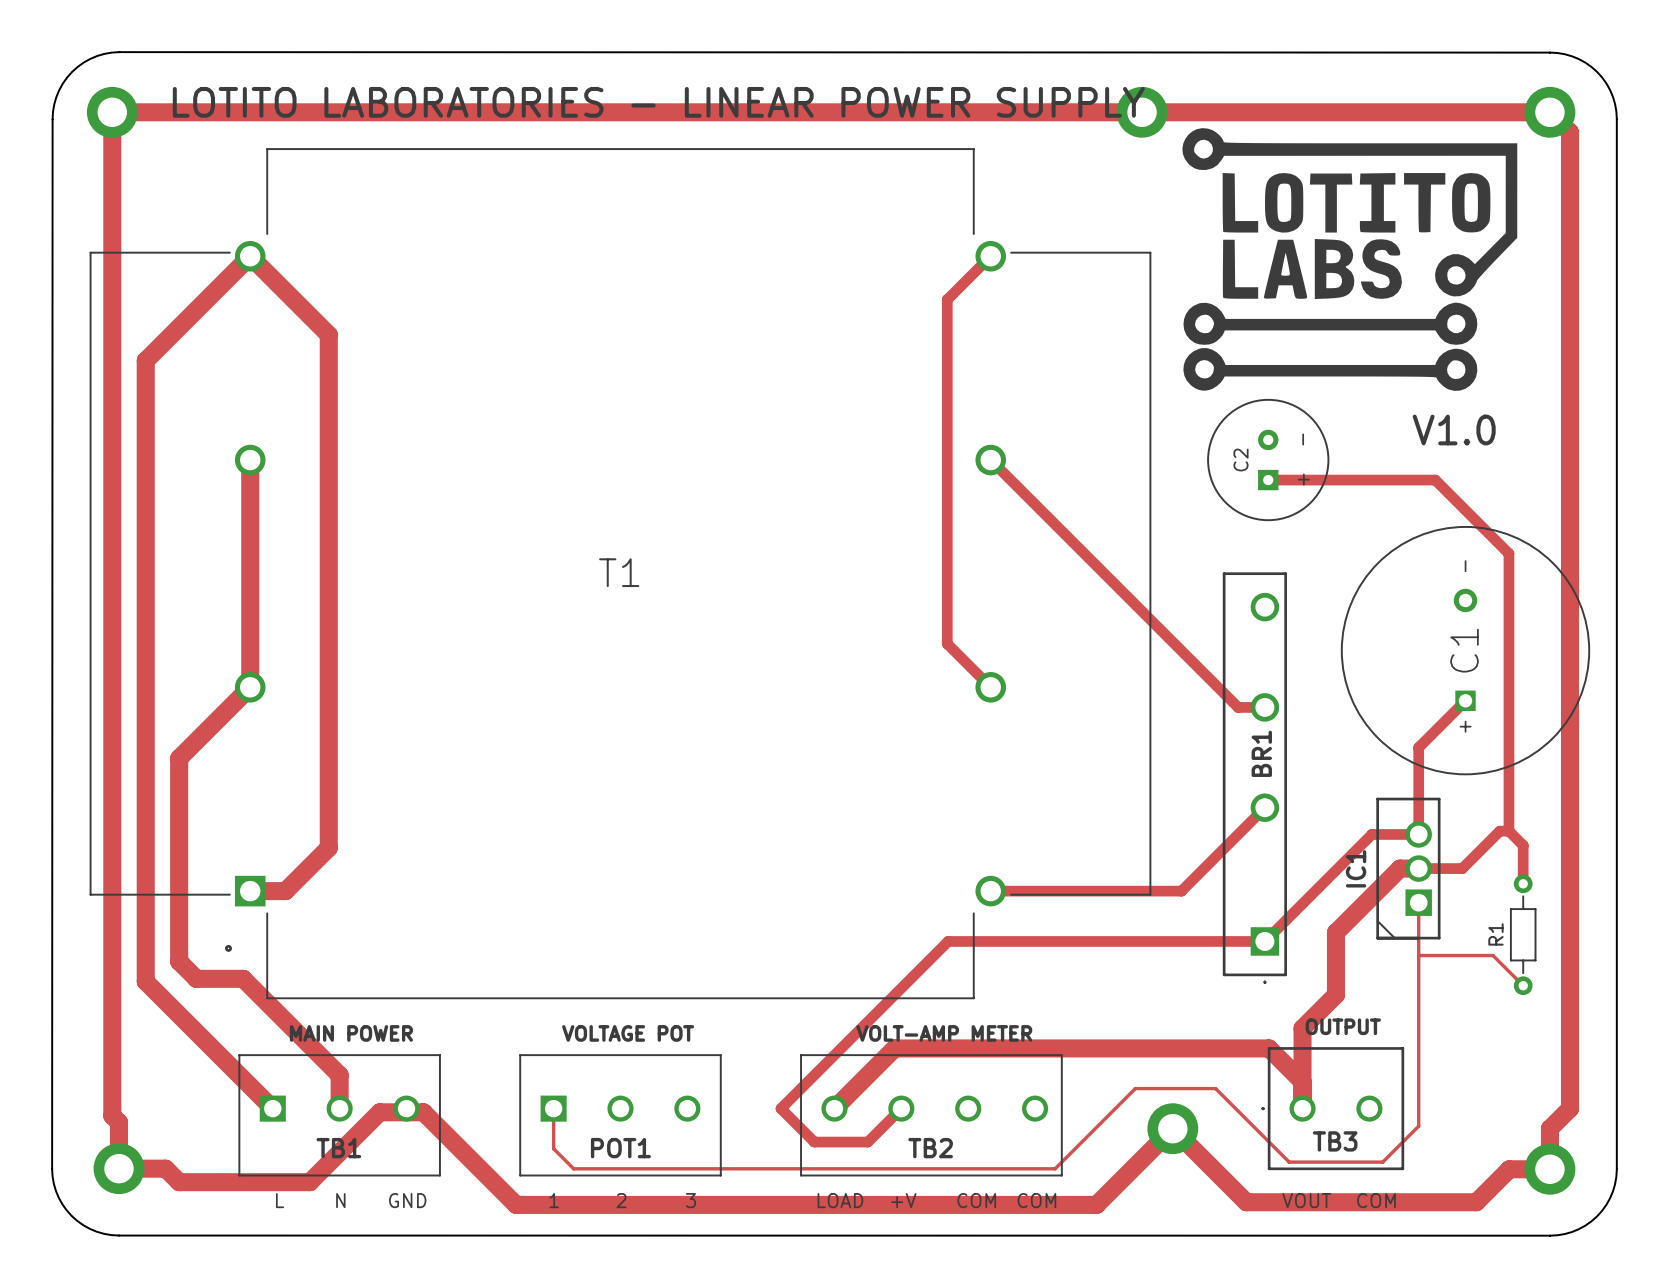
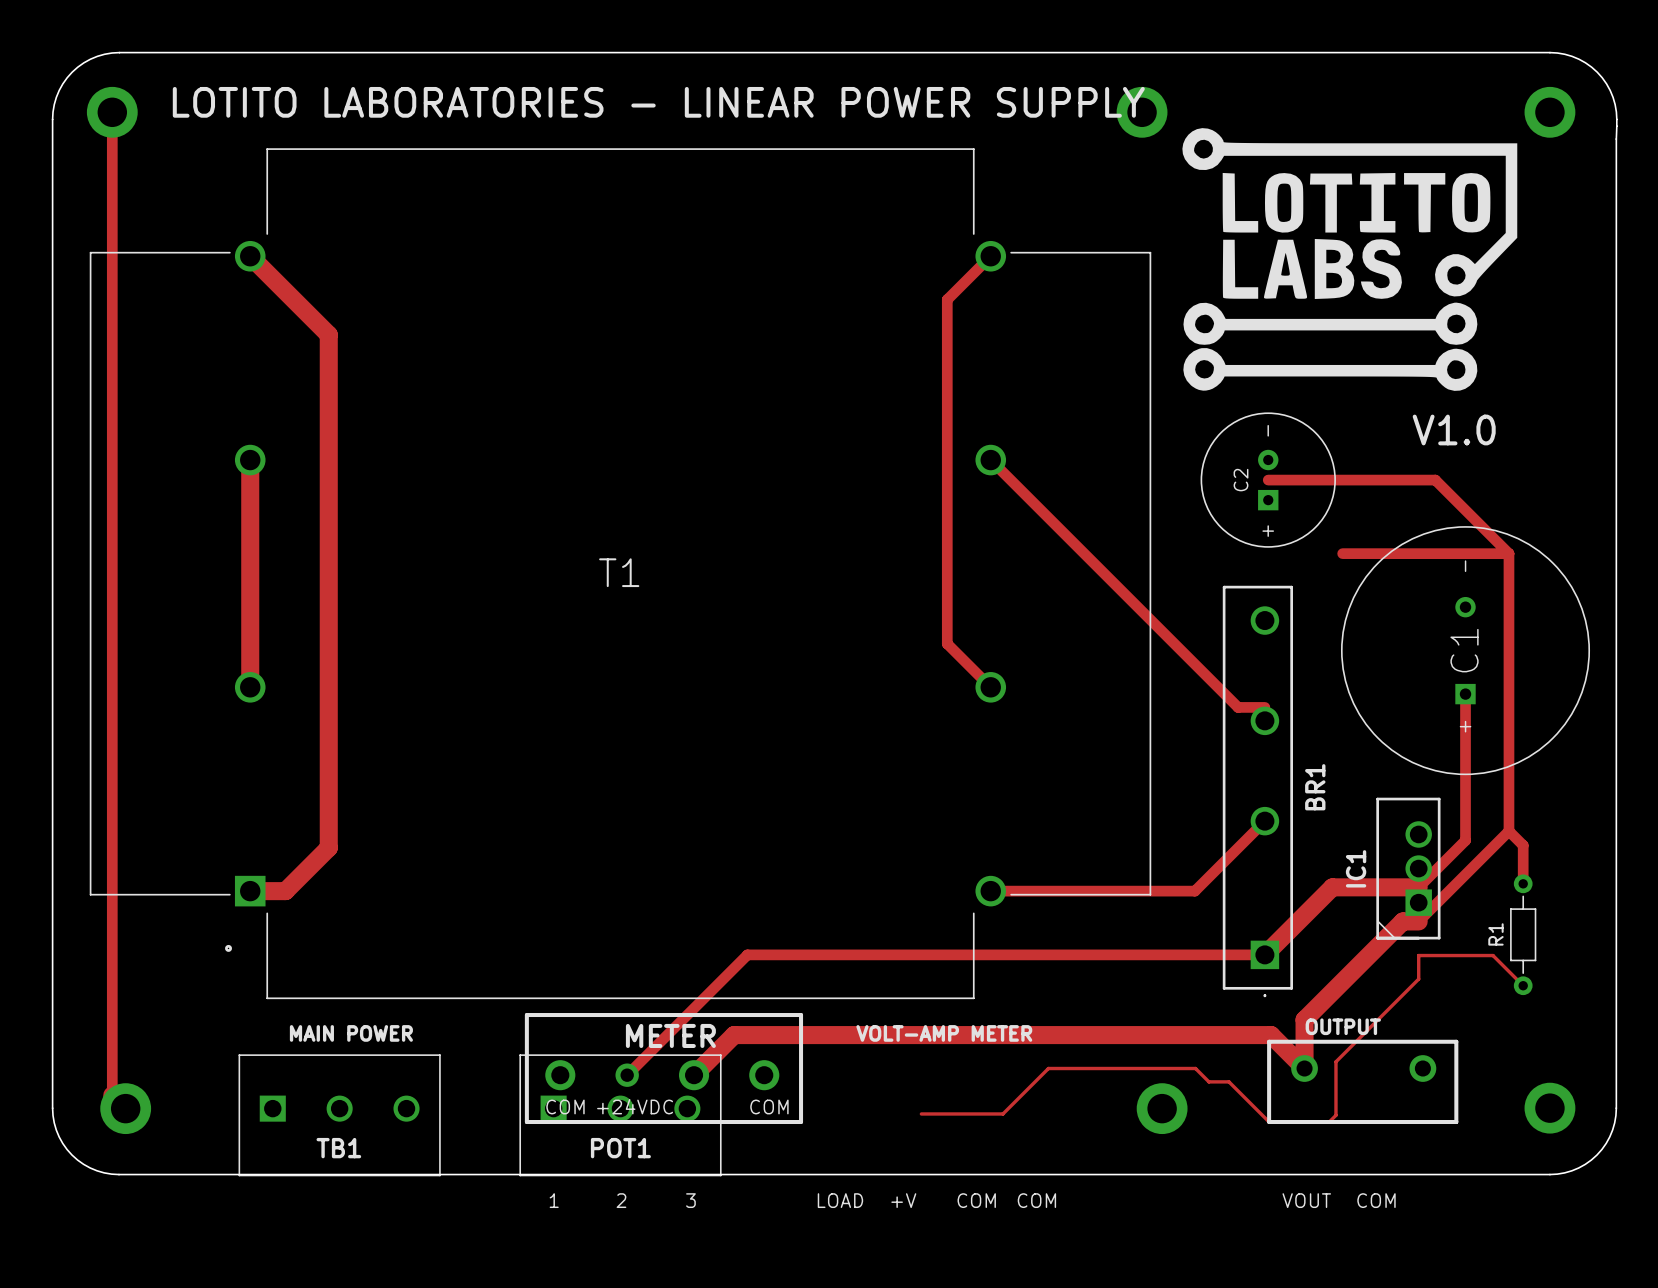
track: (112, 112) (1549, 112) (1570, 132) (1570, 1108) (1549, 1128) (1549, 1169) (1509, 1169) (1476, 1202) (1246, 1202) (1172, 1128) (1096, 1204) (516, 1204) (423, 1112) (379, 1112) (309, 1182) (179, 1182) (165, 1168) (118, 1168) (118, 1122) (112, 1115) -> none
track width: thick (112, 112) (112, 1095) -> thin (112, 112) (112, 1095)
board edge: (1616, 119) (1613, 97) (1606, 83) (1597, 71) (1578, 59) (1564, 54) (1549, 52) (119, 52) (97, 55) (83, 62) (72, 71) (62, 83) (54, 104) (52, 119) (52, 1168) (55, 1190) (62, 1204) (71, 1216) (90, 1228) (104, 1233) (118, 1235) (1549, 1235) (1571, 1232) (1585, 1225) (1602, 1210) (1610, 1198) (1615, 1184) (1616, 1169) (1616, 126) -> (1616, 119) (1613, 97) (1606, 83) (1597, 72) (1578, 59) (1564, 54) (1549, 52) (119, 52) (97, 56) (83, 62) (72, 72) (62, 83) (56, 97) (52, 119) (52, 1108) (54, 1122) (62, 1143) (72, 1155) (90, 1167) (104, 1172) (118, 1174) (1549, 1174) (1564, 1172) (1585, 1164) (1596, 1155) (1606, 1143) (1614, 1122) (1616, 1108) (1616, 126)
track: (250, 256) (145, 360) (145, 981) (272, 1108) -> none
C2 footprint: [1207, 399, 1330, 521] -> [1200, 412, 1336, 548]
C1 footprint: [1341, 526, 1590, 776] -> [1341, 526, 1590, 776]
track: none -> (1342, 553) (1508, 553)
BR1 footprint: [1222, 572, 1287, 984] -> [1222, 585, 1293, 998]
track: (250, 687) (179, 758) (179, 961) (196, 978) (243, 978) (339, 1075) (339, 1108) -> none
track: none -> (1465, 694) (1465, 840) (1418, 887) (1332, 887) (1264, 954) (747, 954) (627, 1075)
track: (1465, 700) (1418, 747) (1418, 834) (1371, 834) (1264, 941) (948, 941) (780, 1108) (814, 1142) (867, 1142) (901, 1108) -> none
BR1 name position: BR1 (1261, 753) -> BR1 (1315, 787)
track: (1264, 807) (1181, 891) -> (1264, 821) (1194, 891) (1181, 891)
track: (1508, 831) (1499, 831) (1462, 868) (1399, 868) (1335, 932) (1335, 994) (1302, 1028) (1302, 1108) -> (1508, 831) (1418, 921) (1402, 921) (1304, 1019) (1304, 1068) (1271, 1035) (734, 1035) (694, 1075)
track: (1418, 902) (1418, 955) -> none
track: (1418, 979) (1418, 1126) (1382, 1162) (1289, 1162) (1215, 1088) (1135, 1088) (1055, 1168) (573, 1168) (553, 1148) (553, 1108) -> (1418, 979) (1335, 1061) (1335, 1115) (1329, 1122) (1269, 1122) (1228, 1081) (1208, 1081) (1195, 1068) (1048, 1068) (1002, 1113) (921, 1113)
line: none -> (526, 1015) (801, 1015) (801, 1122) (526, 1122) (526, 1015)
text: VOLTAGE POT (628, 1033) -> none
text: none -> METER (670, 1035)
line: none -> (1269, 1041) (1456, 1041) (1456, 1122) (1269, 1122) (1269, 1041)
via: none -> (1304, 1068)
via: none -> (1422, 1068)
via: none -> (560, 1075)
via: none -> (627, 1075)
via: none -> (694, 1075)
via: none -> (764, 1075)
track: (1302, 1081) (1269, 1048) (894, 1048) (834, 1108) -> none
text: none -> COM (565, 1106)
text: none -> +24VDC (635, 1106)
text: none -> COM (769, 1106)
TB3: (1332, 1108) -> none
TB2: (931, 1115) -> none
part position: (1172, 1128) -> (1162, 1108)
part position: (118, 1168) -> (125, 1108)
part position: (1549, 1169) -> (1549, 1108)
text: L (280, 1200) -> none
text: N (340, 1200) -> none
text: GND (407, 1200) -> none

